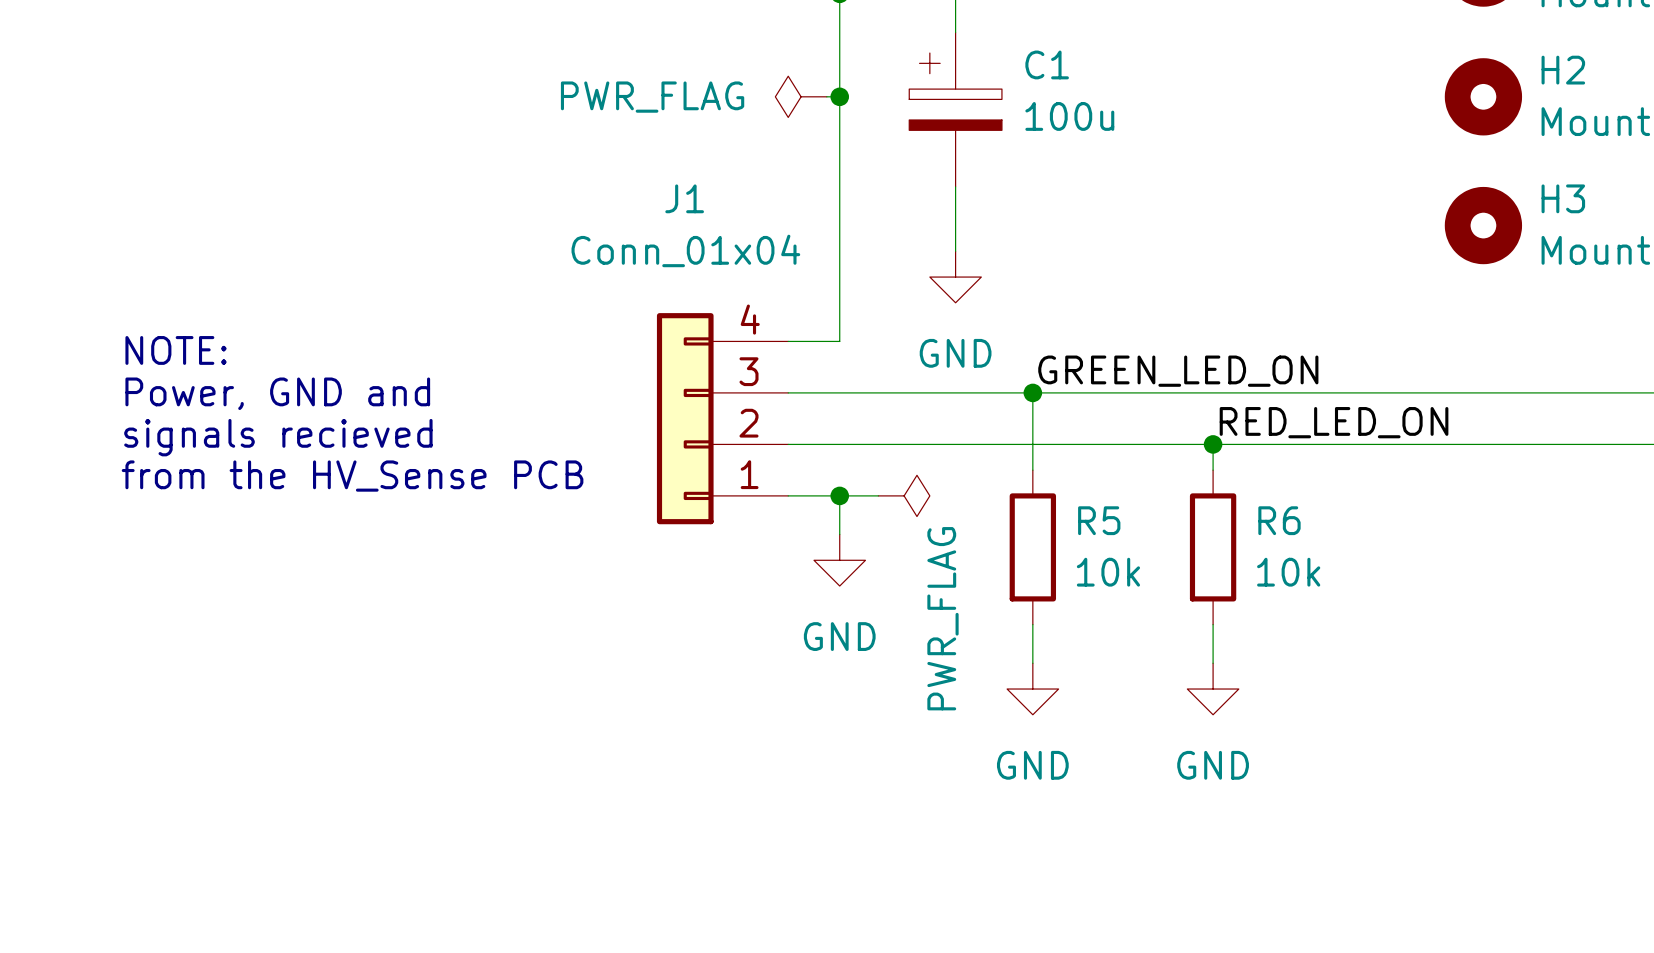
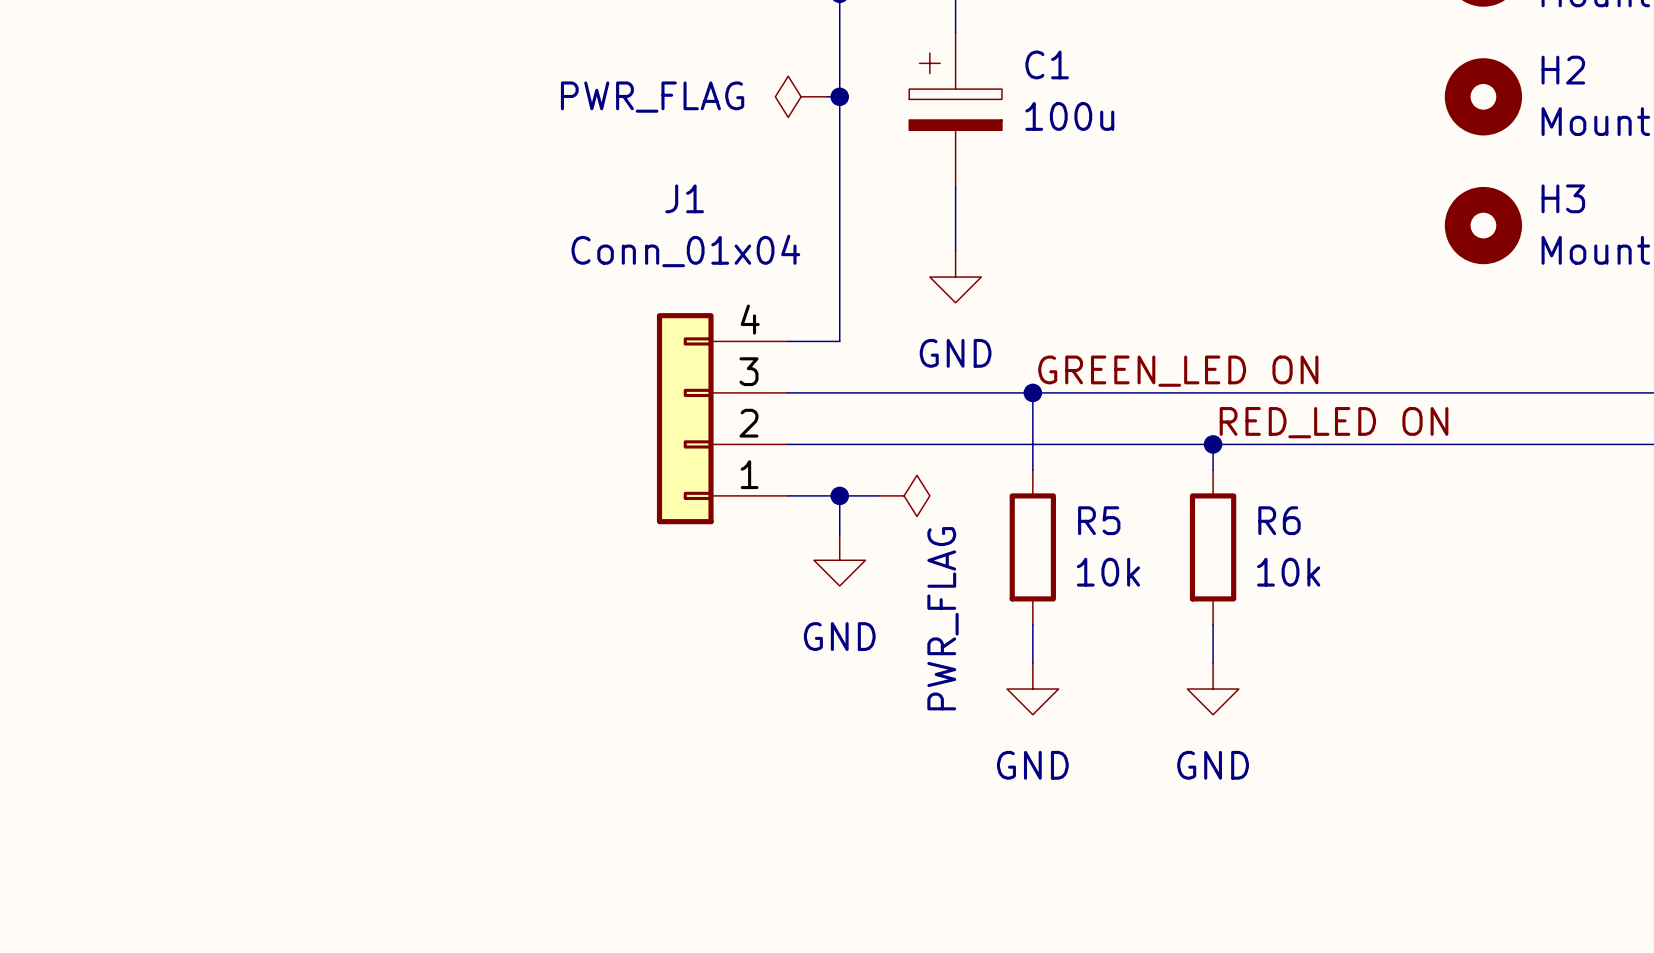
text: NOTE: (176, 350) -> none
label: GREEN_LED_ON (1178, 371) -> GREEN_LED ON (1178, 371)
text: Power, GND and (277, 393) -> none
label: RED_LED_ON (1334, 422) -> RED_LED ON (1334, 422)
text: signals recieved (278, 437) -> none
text: from the HV_Sense PCB (352, 476) -> none

